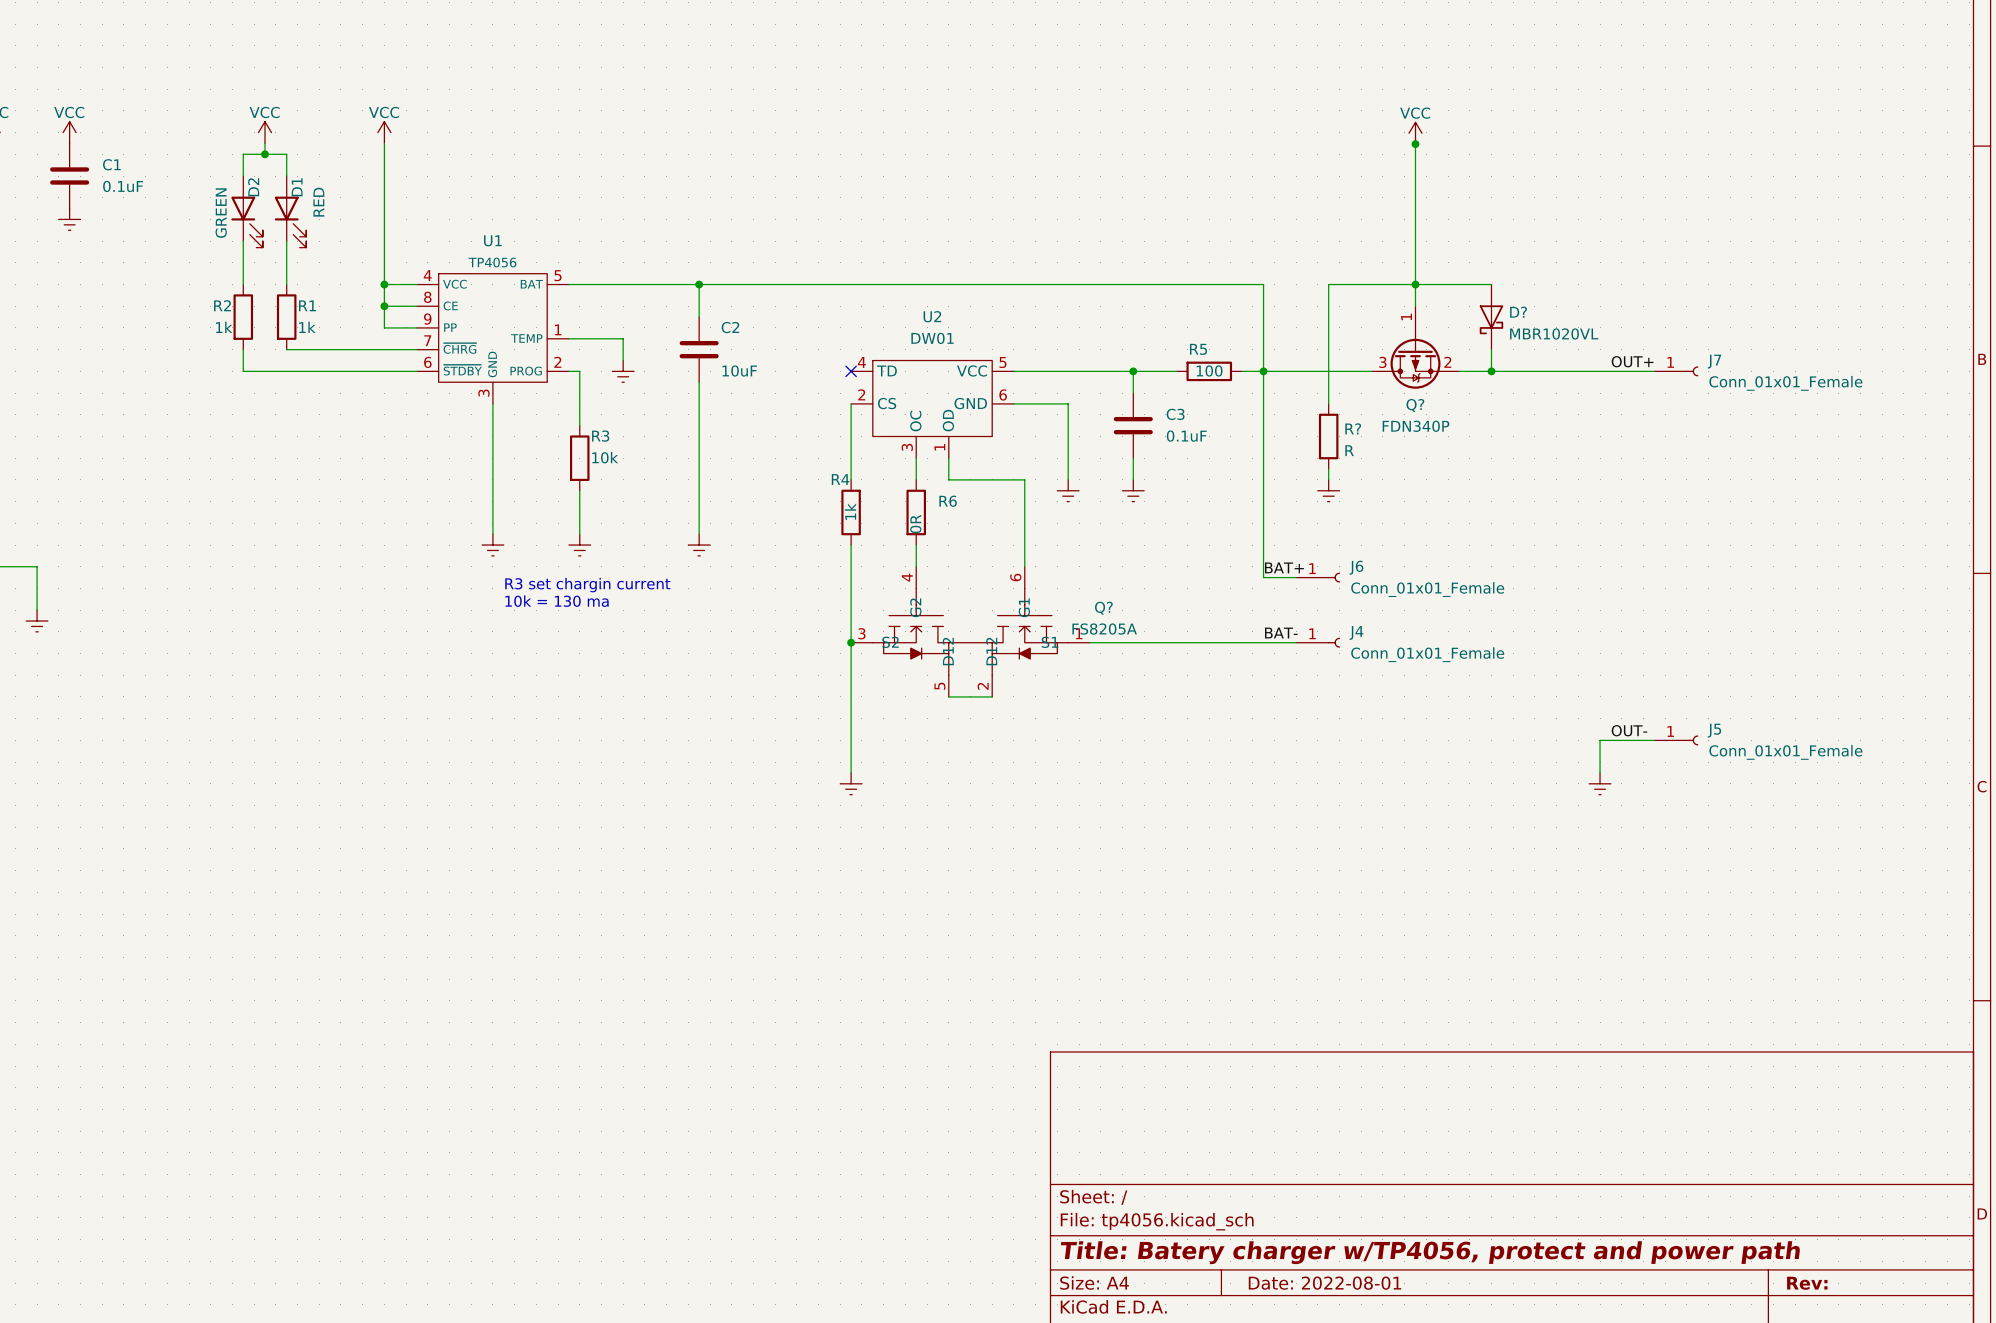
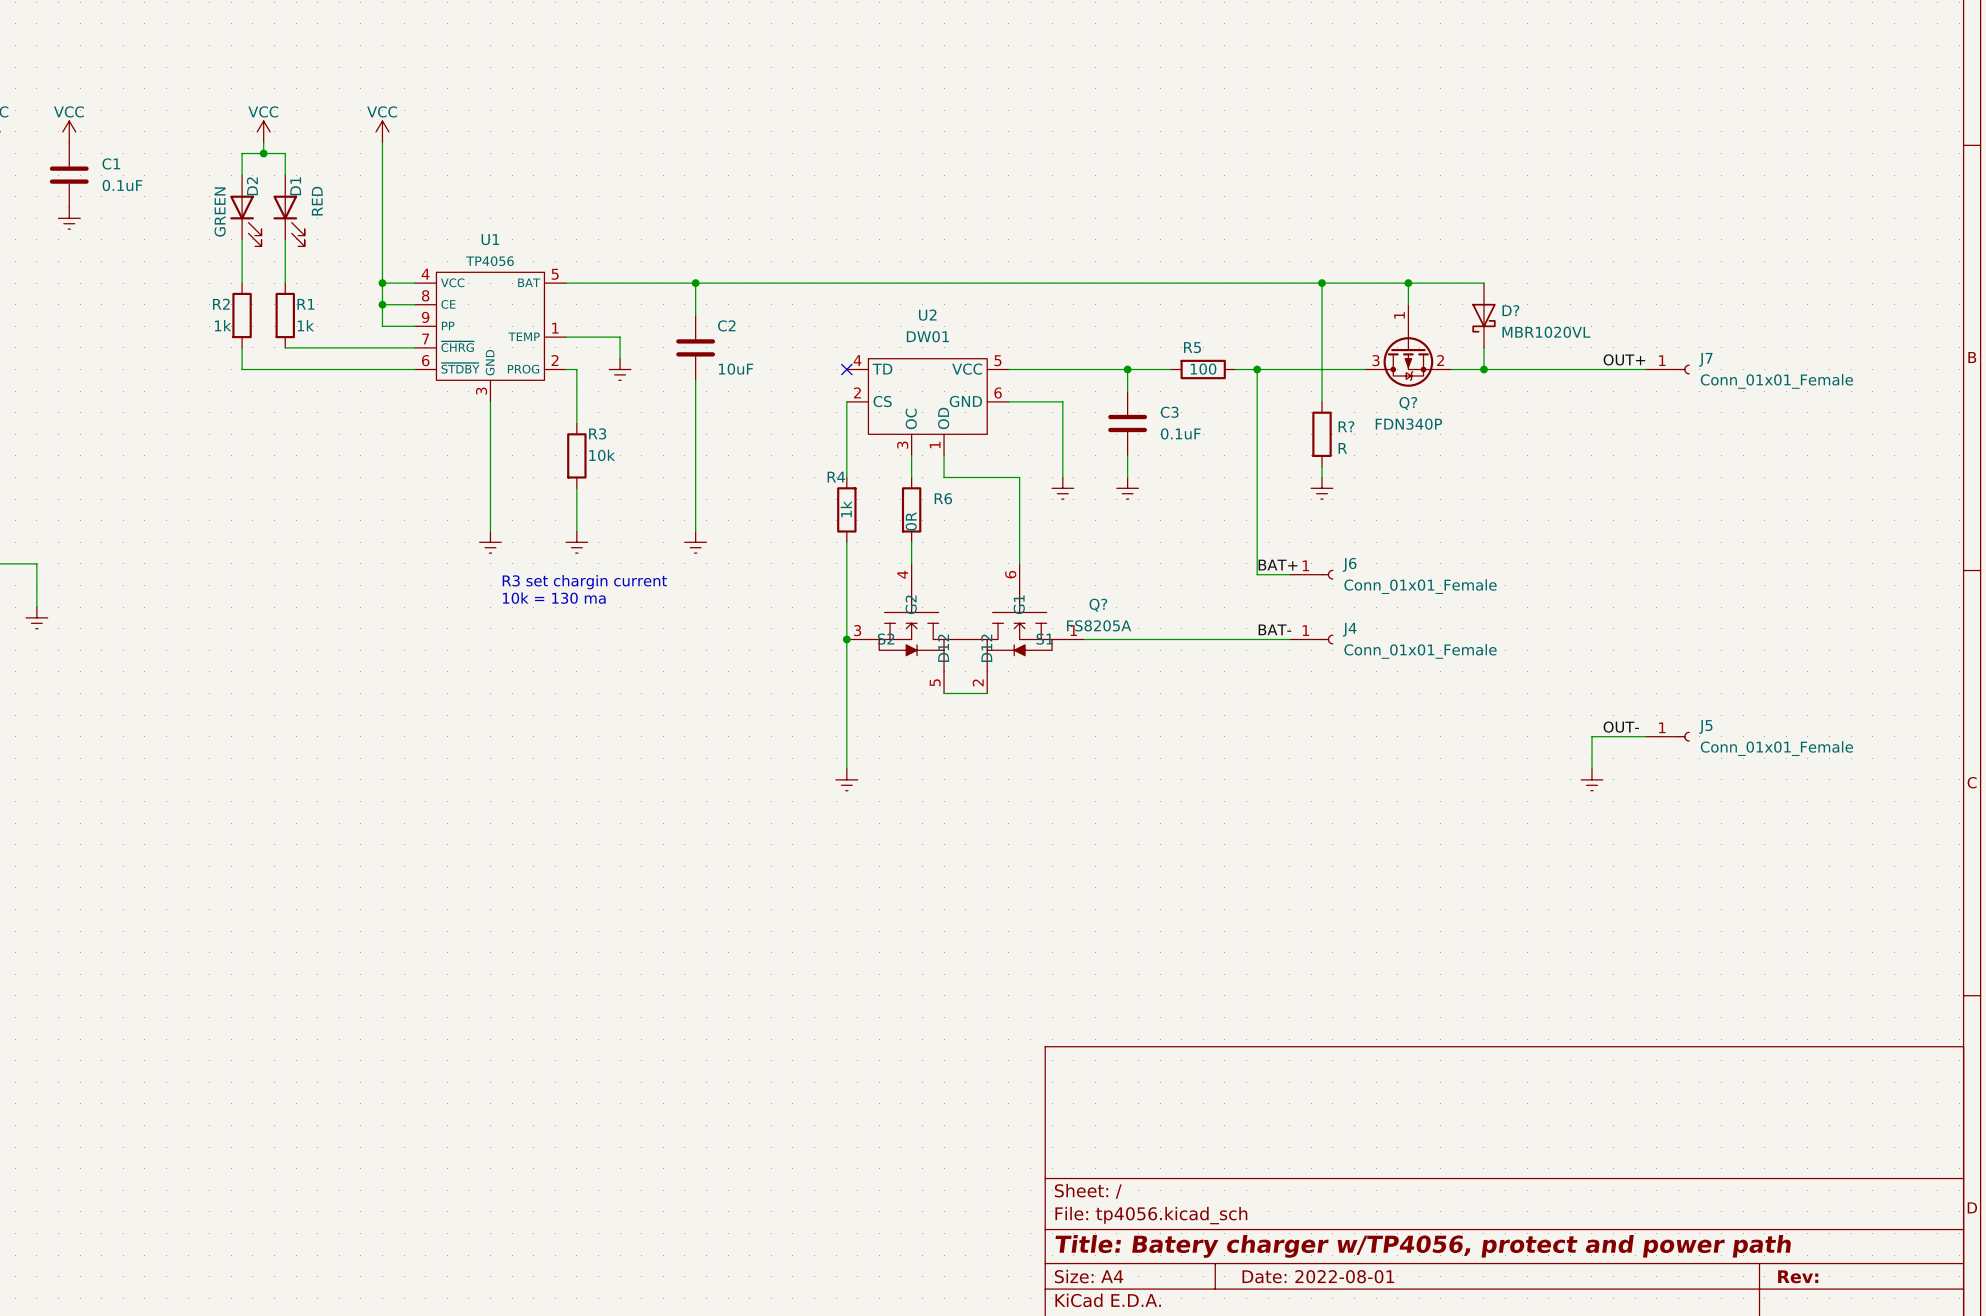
power symbol: VCC (1415, 133) -> none
wire: (1415, 143) (1415, 284) -> none
junction: (1415, 144) -> none
wire: (1263, 284) (1263, 371) -> (1257, 283) (1322, 283)
junction: none -> (1322, 283)

